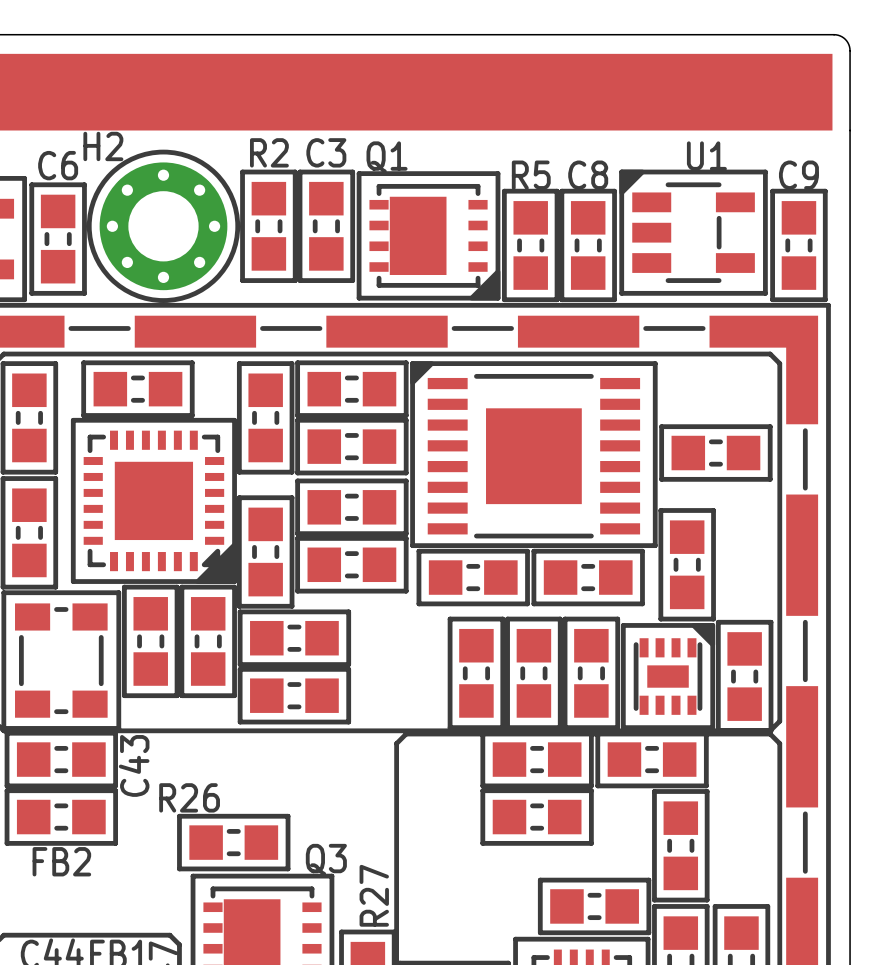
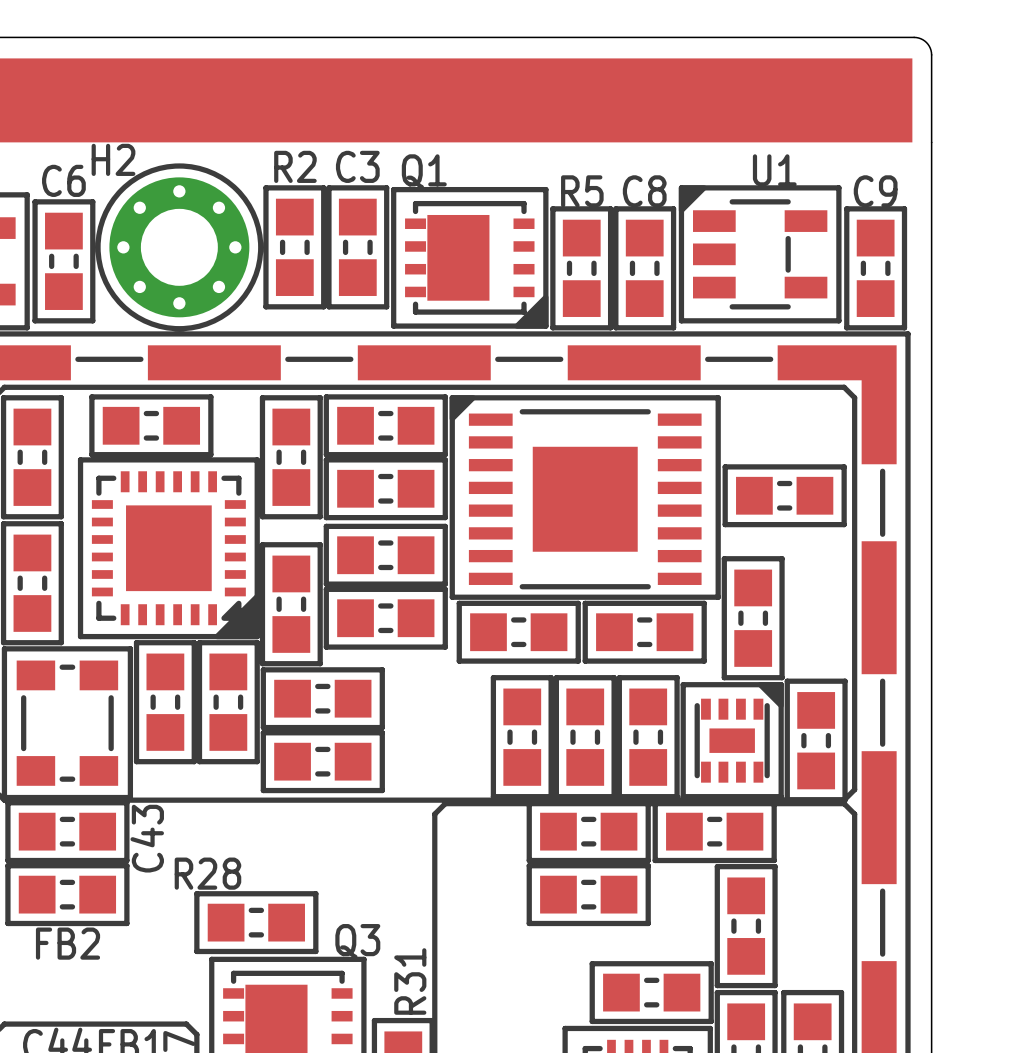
R26 name: R26 (189, 797) -> R28 (207, 873)
R27 name: R27 (374, 895) -> R31 (410, 981)

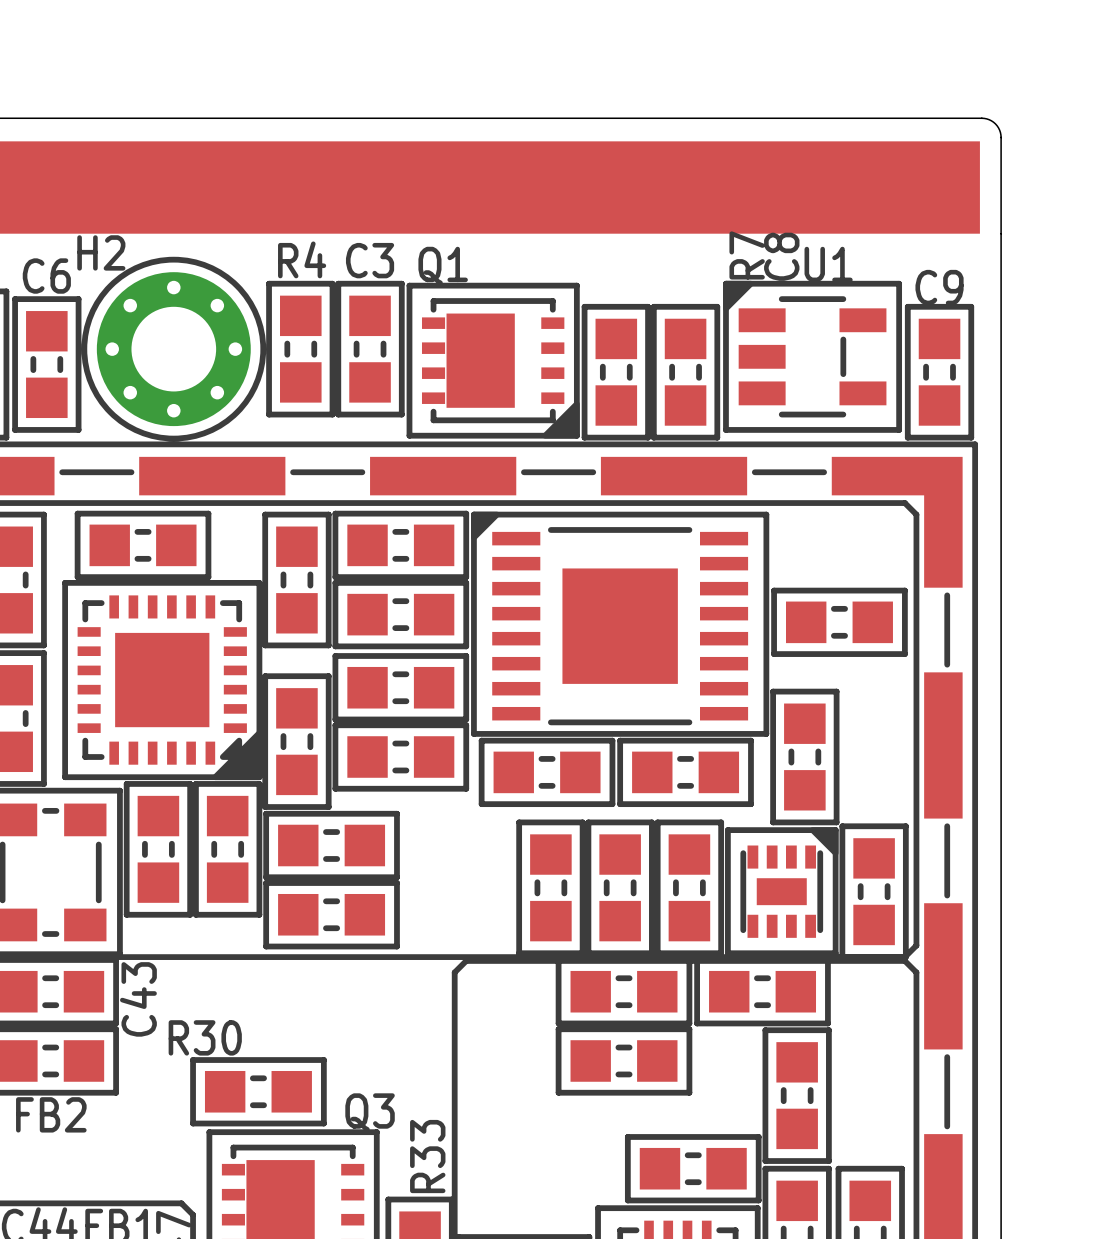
R2 name: R2 (295, 166) -> R4 (302, 259)
R5 name: R5 (582, 191) -> R7 (747, 255)
C8 name rotation: 0° (644, 191) -> 90° counterclockwise (781, 256)
C8 name position: C8 (644, 191) -> C8 (781, 256)
R28 name: R28 (207, 873) -> R30 (205, 1037)
R31 name: R31 (410, 981) -> R33 (427, 1156)

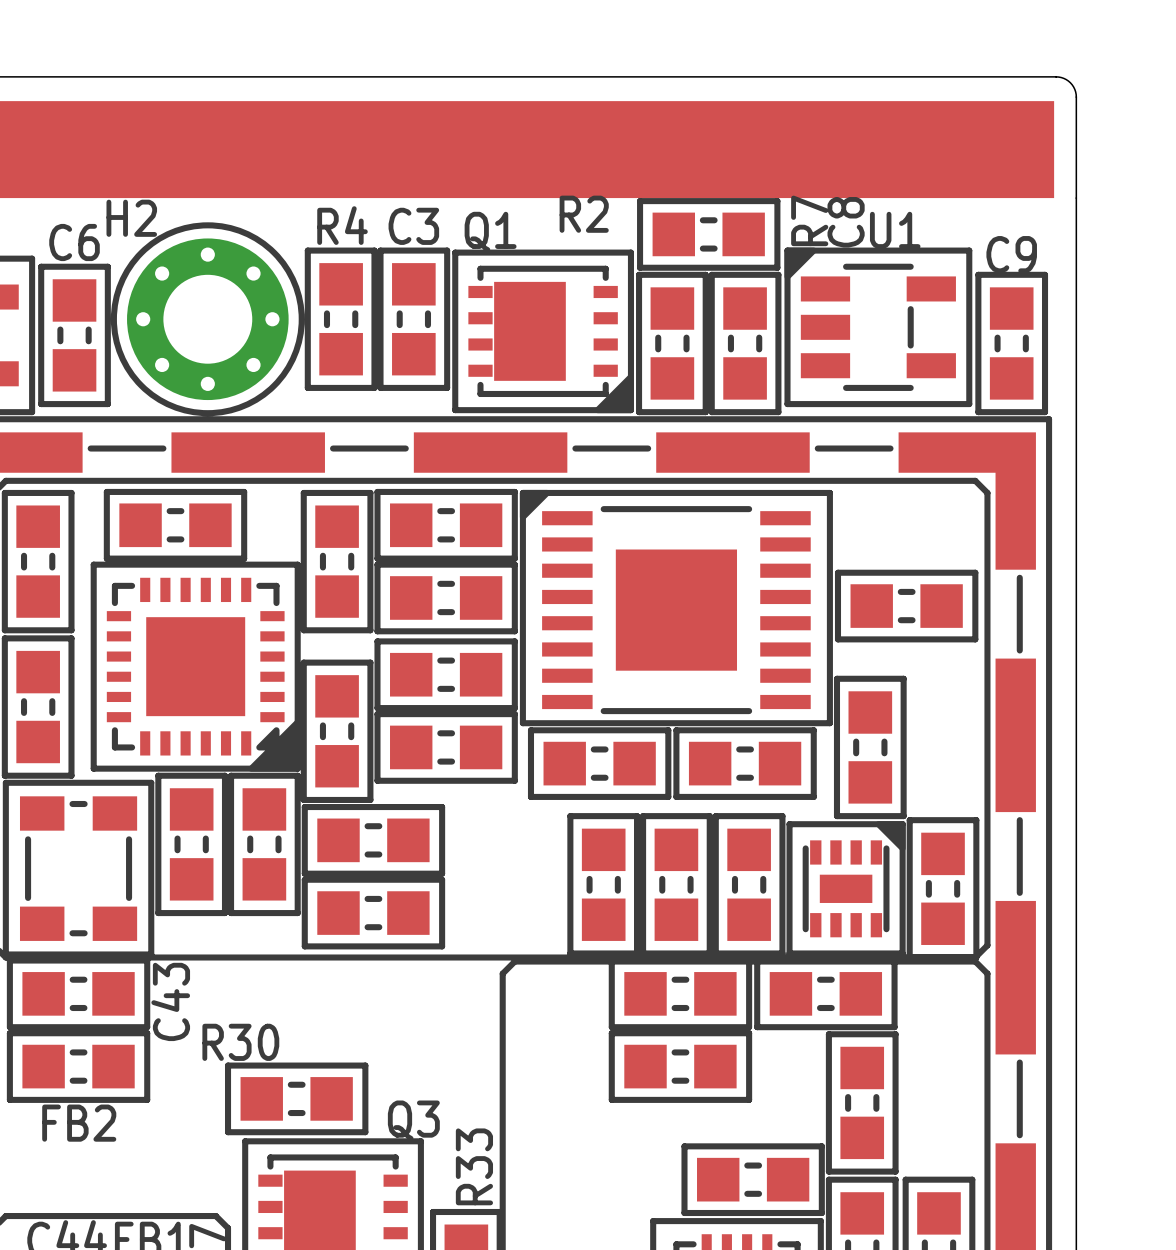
R2: none -> (708, 234)

